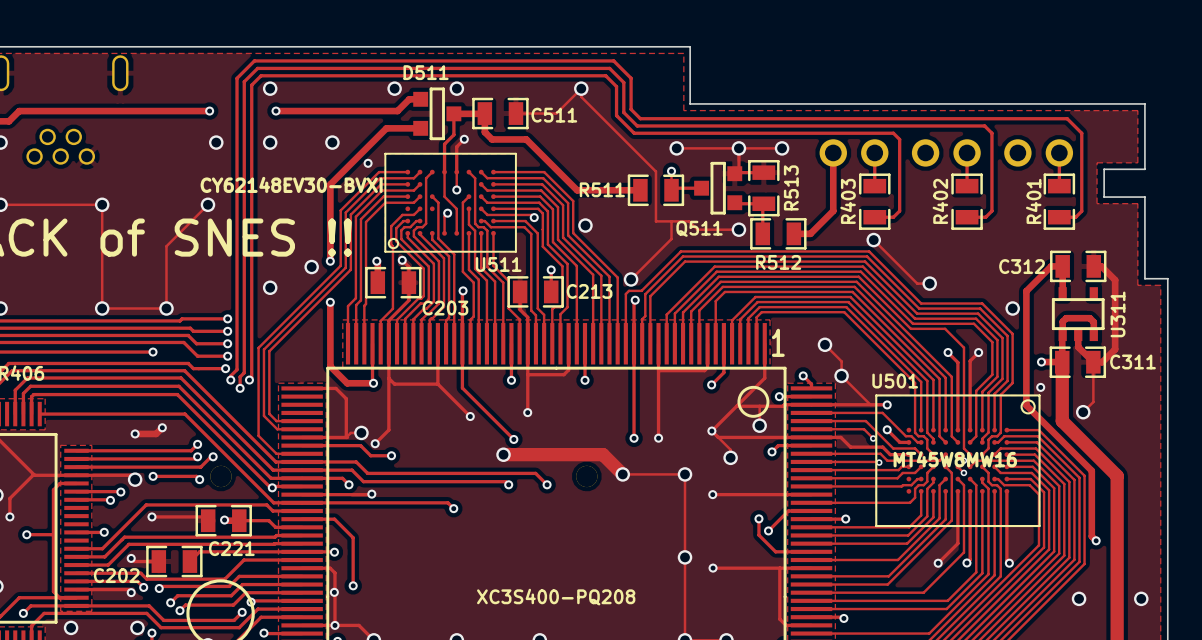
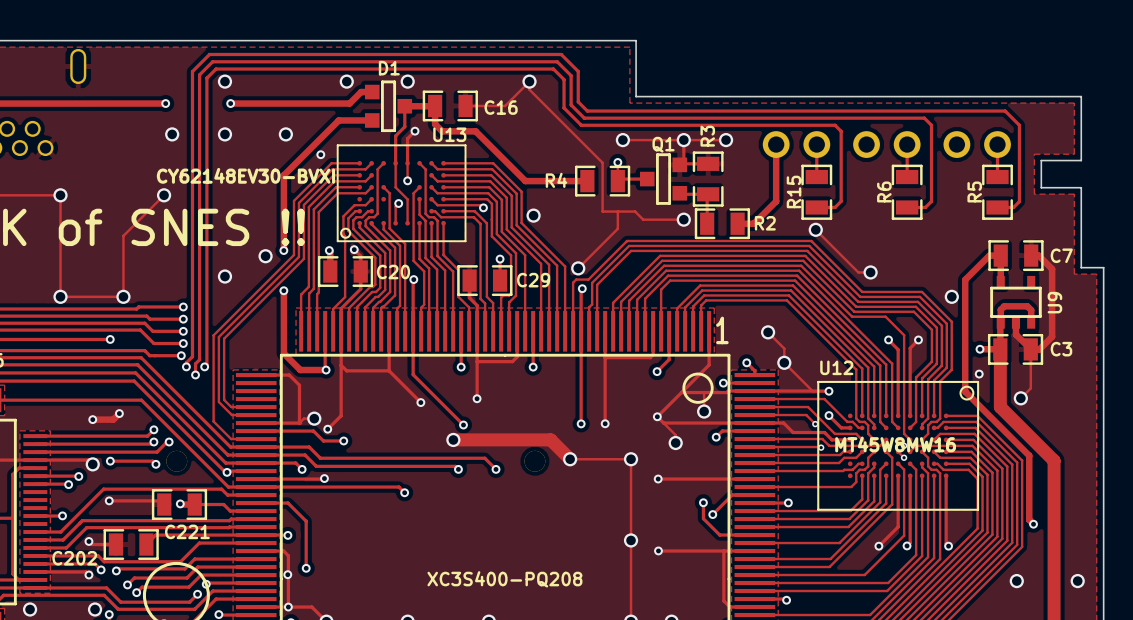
D511 name: D511 (426, 72) -> D1 (389, 68)
C511 name: C511 (554, 115) -> C16 (501, 107)
R513 name: R513 (791, 187) -> R3 (707, 136)
R511 name: R511 (602, 189) -> R4 (556, 180)
R403 name: R403 (848, 201) -> R15 (794, 191)
R402 name: R402 (940, 201) -> R6 (884, 191)
R401 name: R401 (1033, 201) -> R5 (974, 191)
Q511 name: Q511 (699, 228) -> Q1 (663, 144)
R512 name: R512 (778, 262) -> R2 (765, 223)
U511 name: U511 (498, 264) -> U13 (449, 134)
C312 name: C312 (1022, 266) -> C7 (1061, 255)
C213 name: C213 (589, 291) -> C29 (533, 280)
C203 name: C203 (445, 308) -> C20 (393, 272)
U311 name: U311 (1118, 314) -> U9 (1054, 302)
C311 name: C311 (1132, 361) -> C3 (1061, 349)
U501 name: U501 (895, 381) -> U12 (836, 367)

